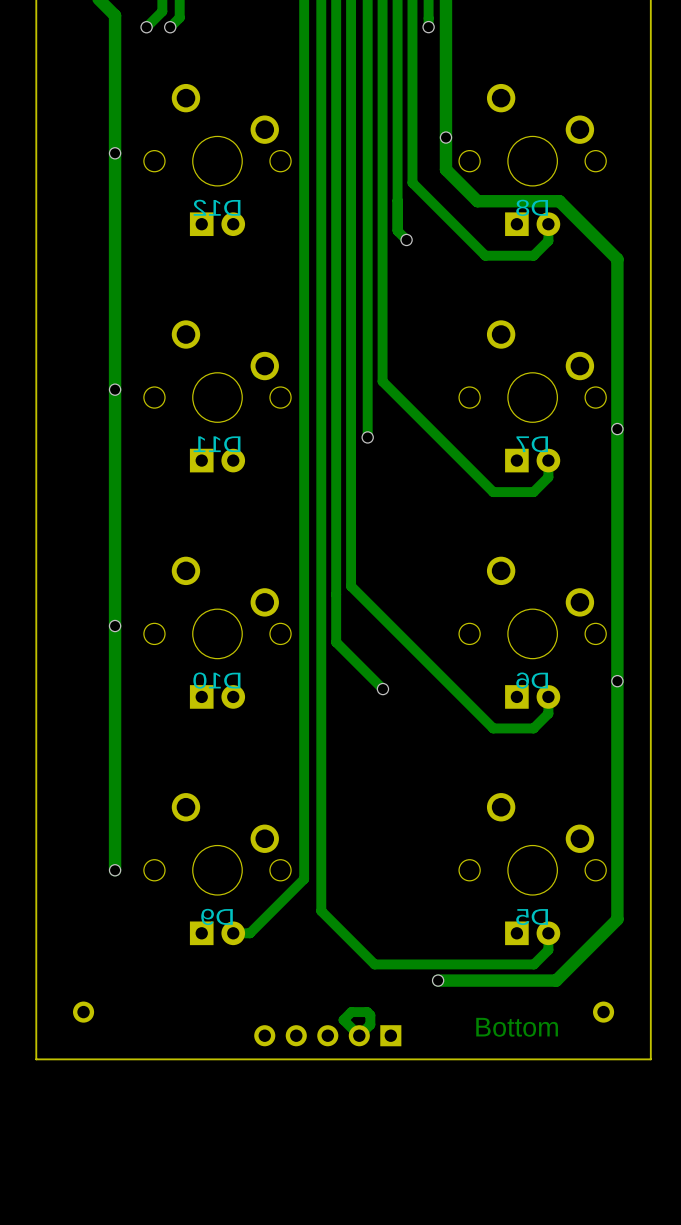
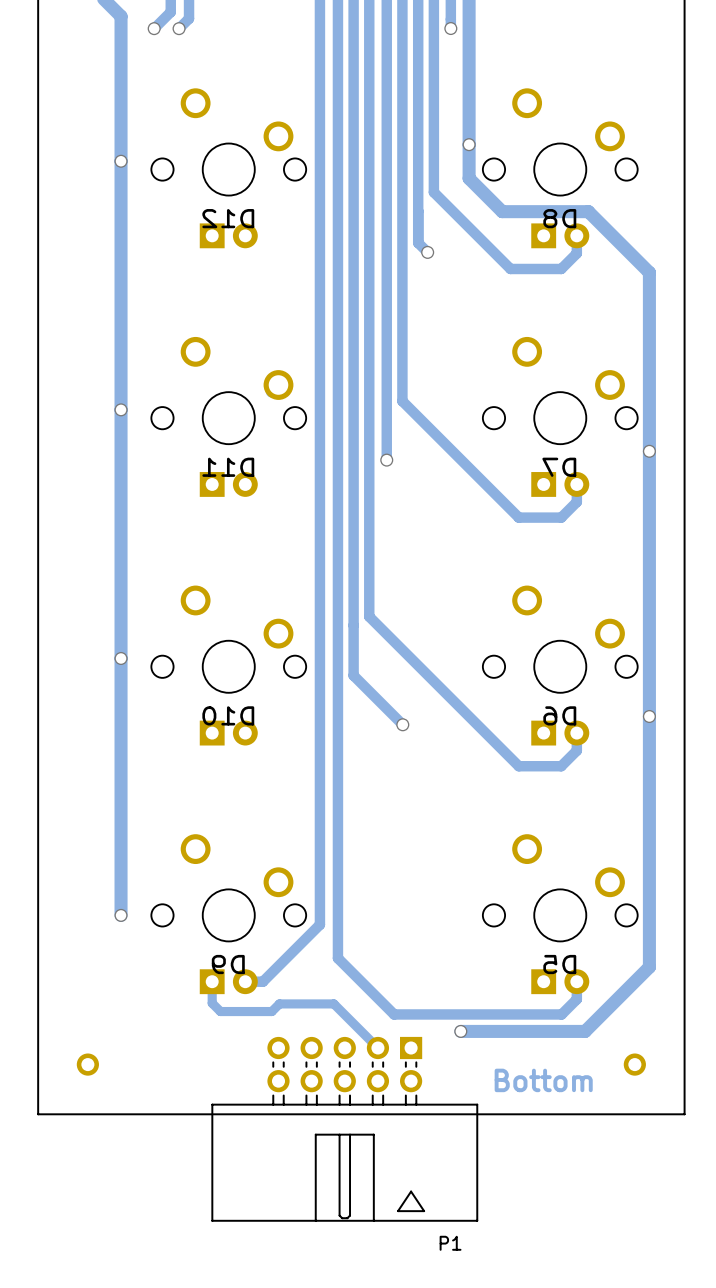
track: none -> (212, 981) (212, 1003) (220, 1011) (271, 1011) (279, 1003) (333, 1003) (377, 1048)
track: (367, 1012) (351, 1012) (343, 1019) (359, 1035) (370, 1024) (370, 1015) (367, 1012) -> none
part: (327, 1035) -> none
P1: none -> (344, 1129)

